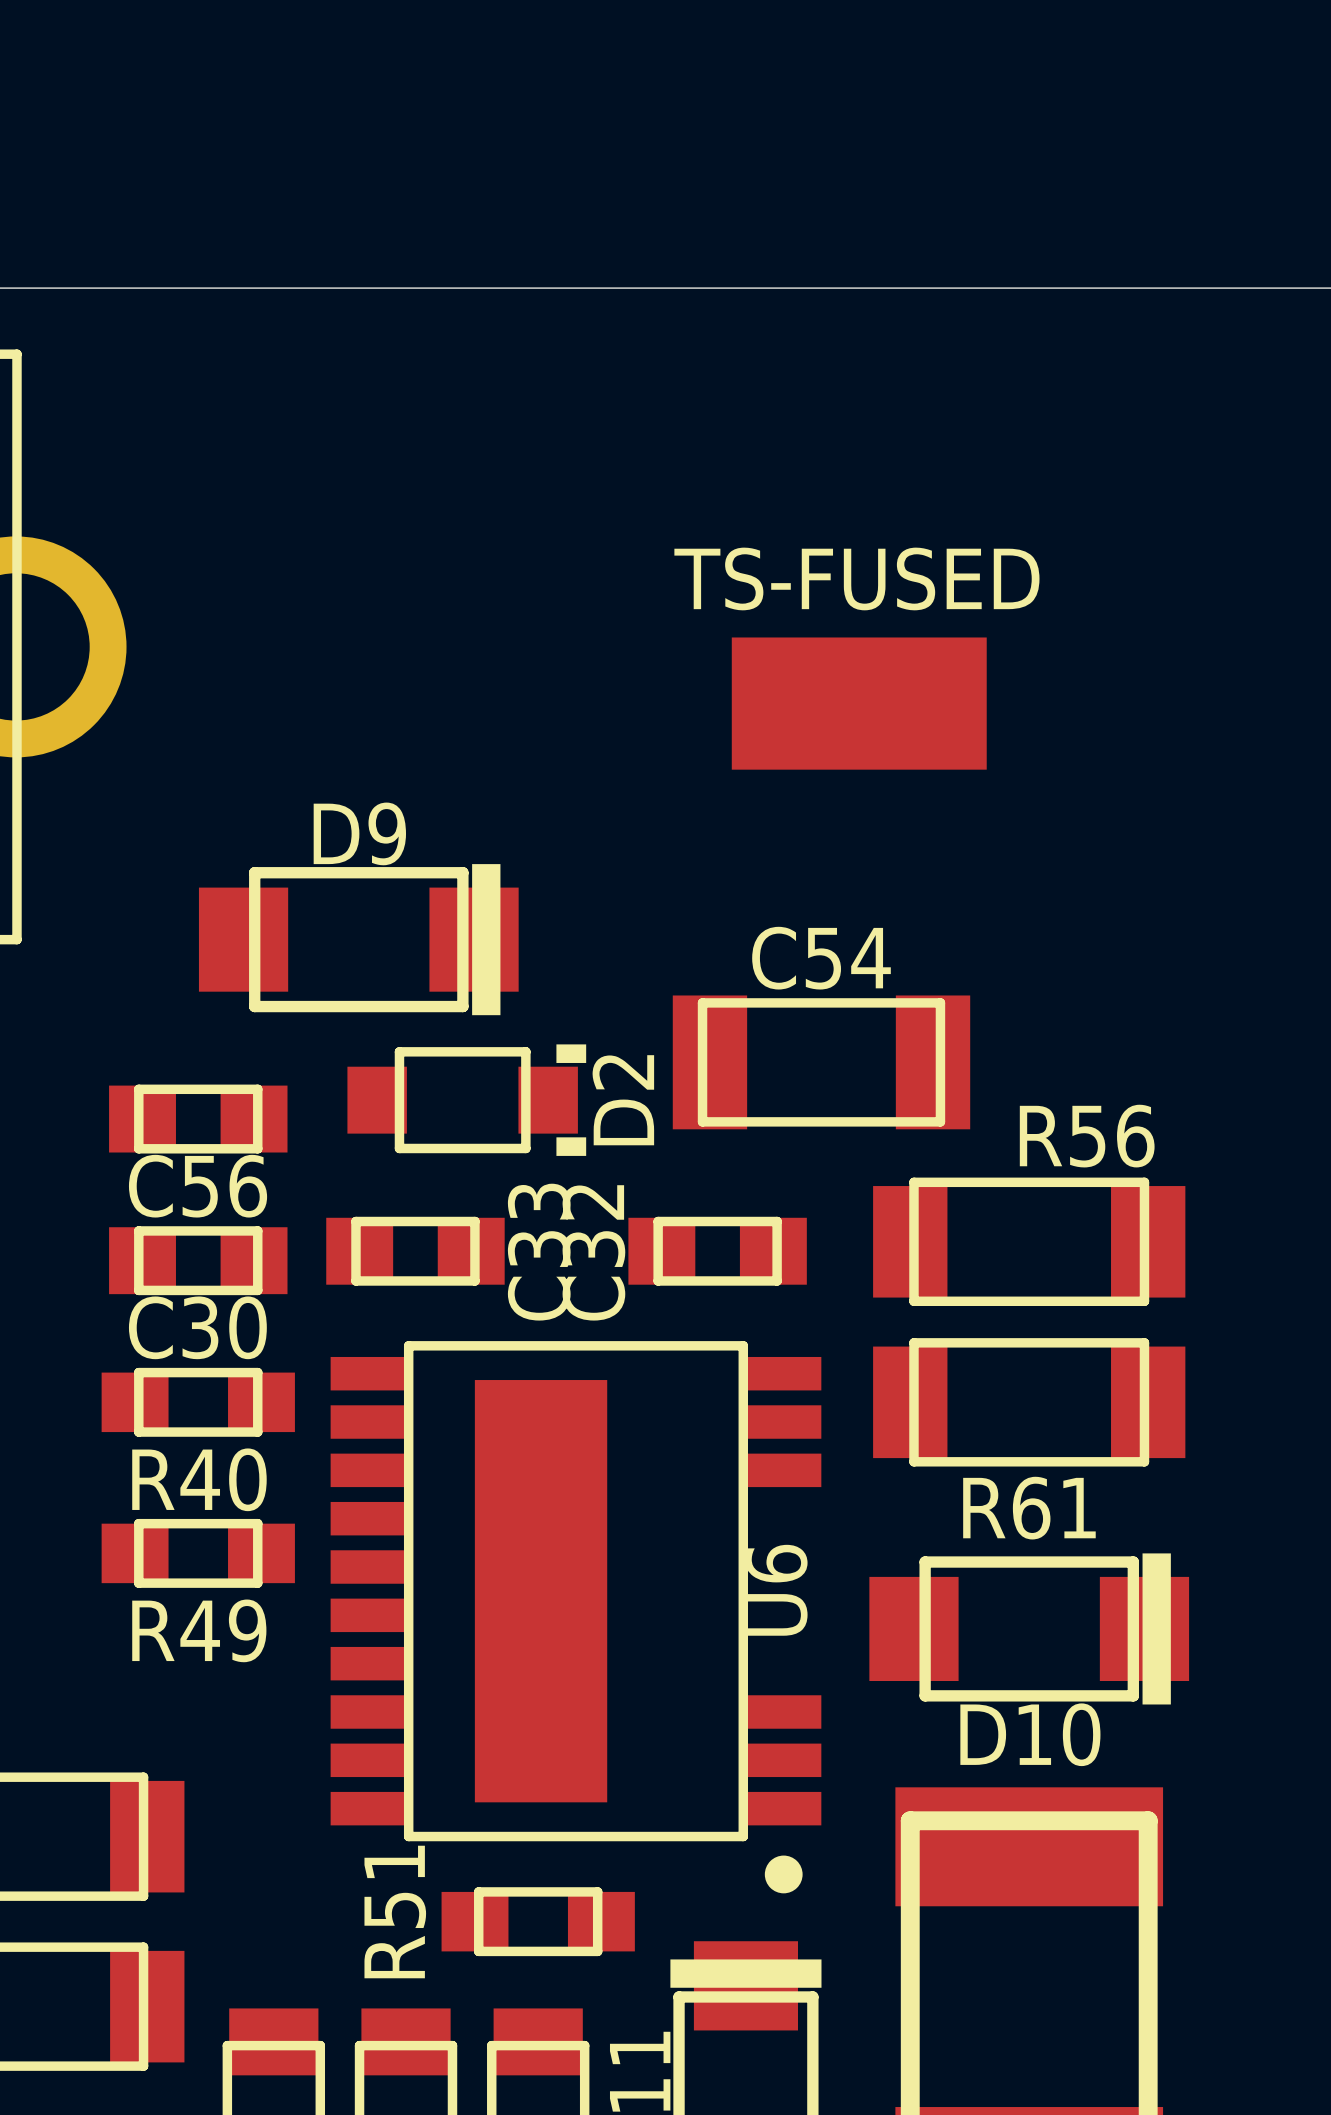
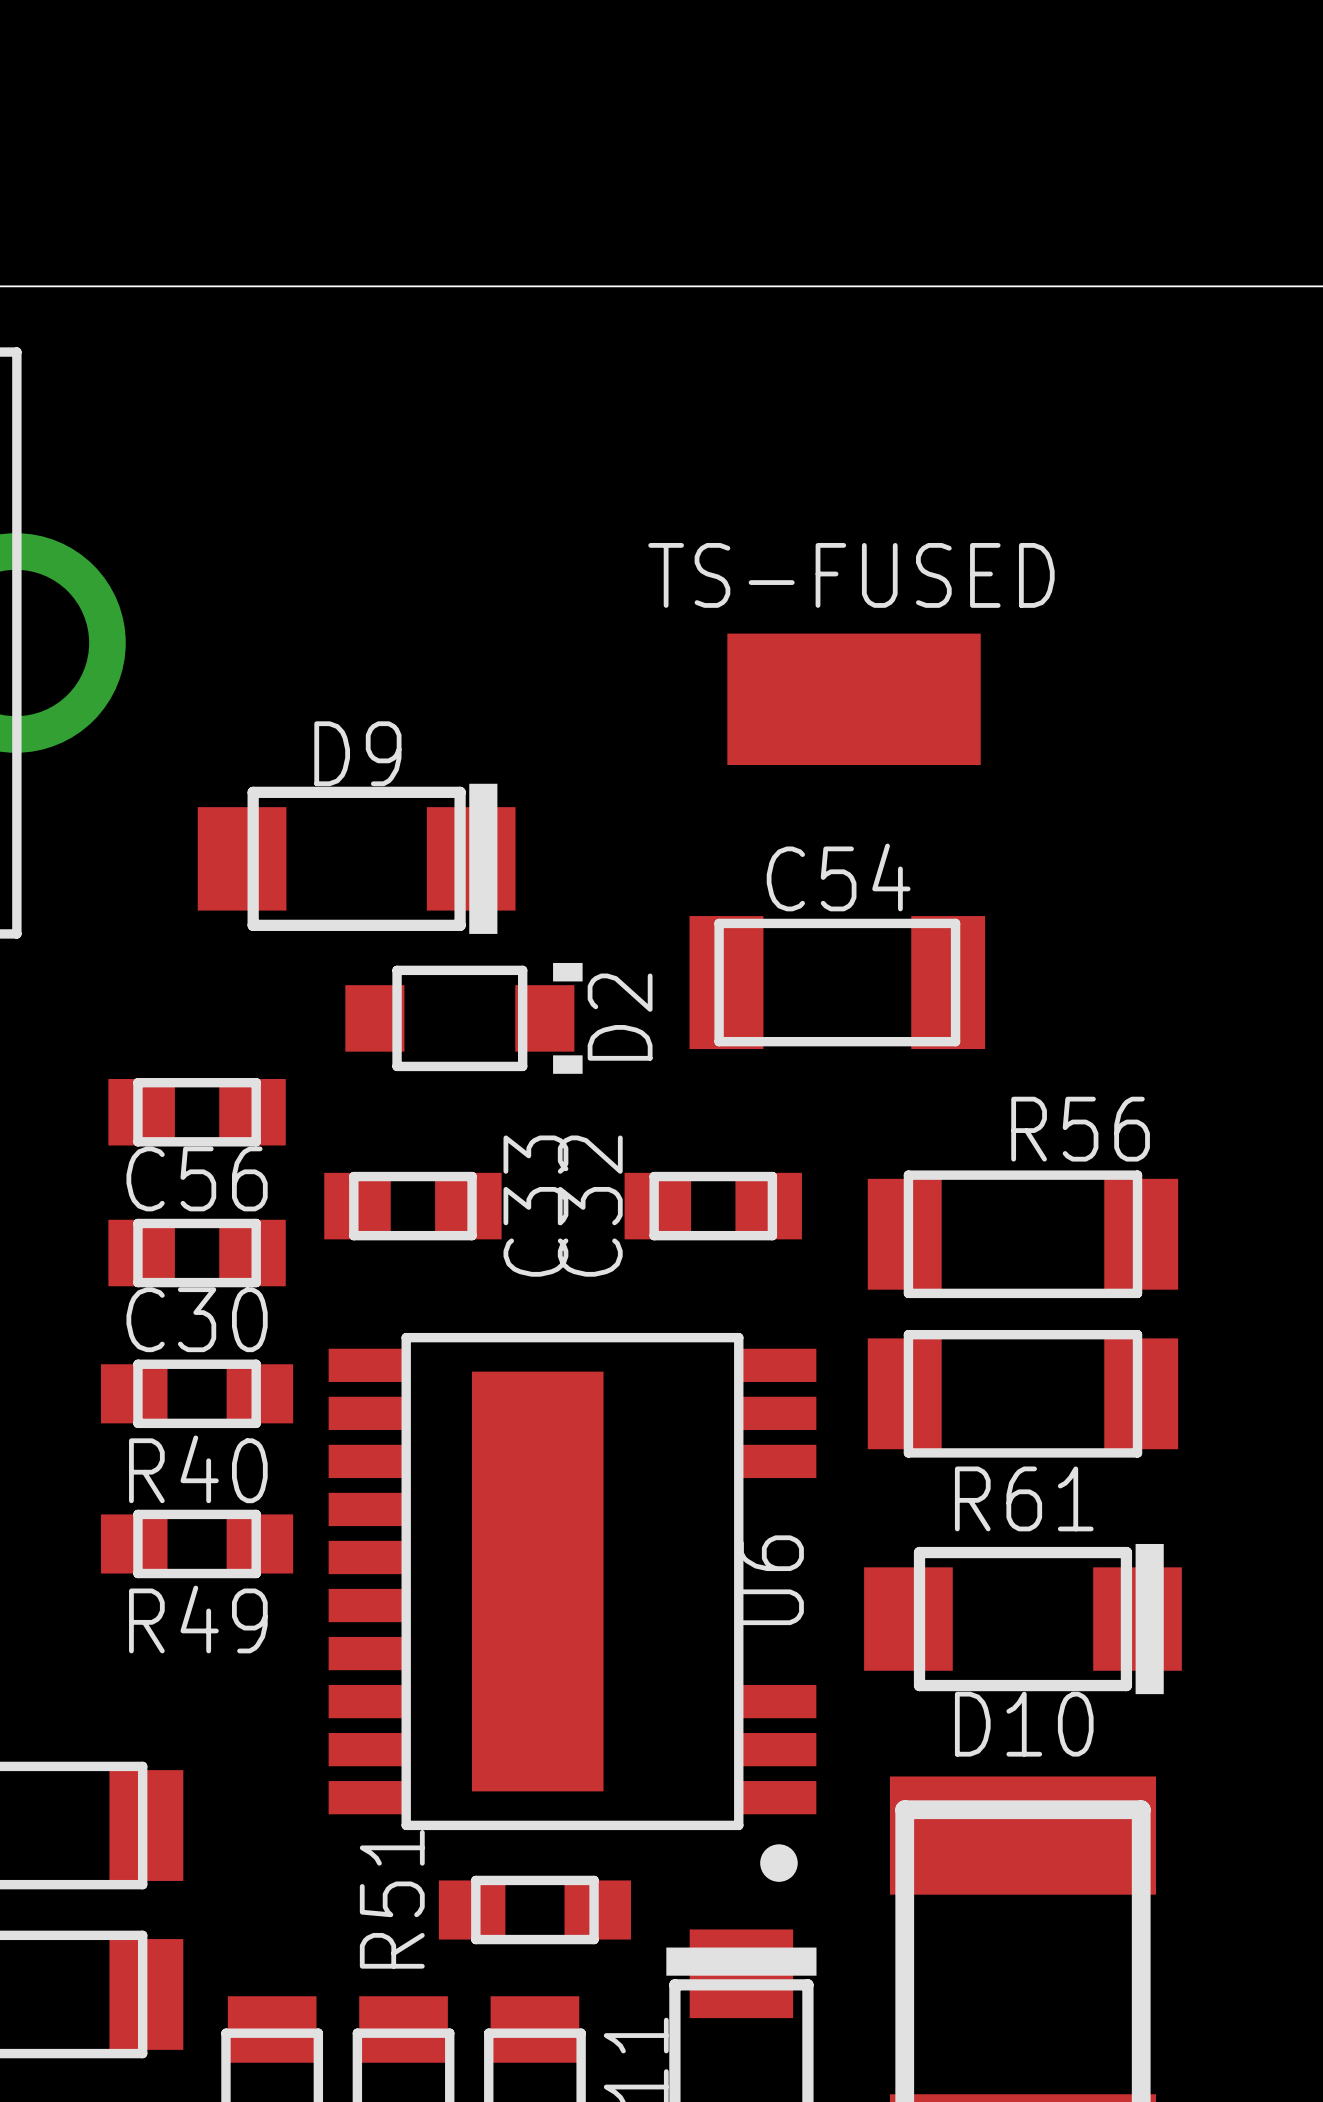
D9 position: (358, 939) -> (356, 858)
C54 position: (821, 1062) -> (837, 982)
D2 position: (466, 1100) -> (463, 1018)
C33 position: (415, 1251) -> (412, 1206)
C32 position: (717, 1251) -> (713, 1206)

